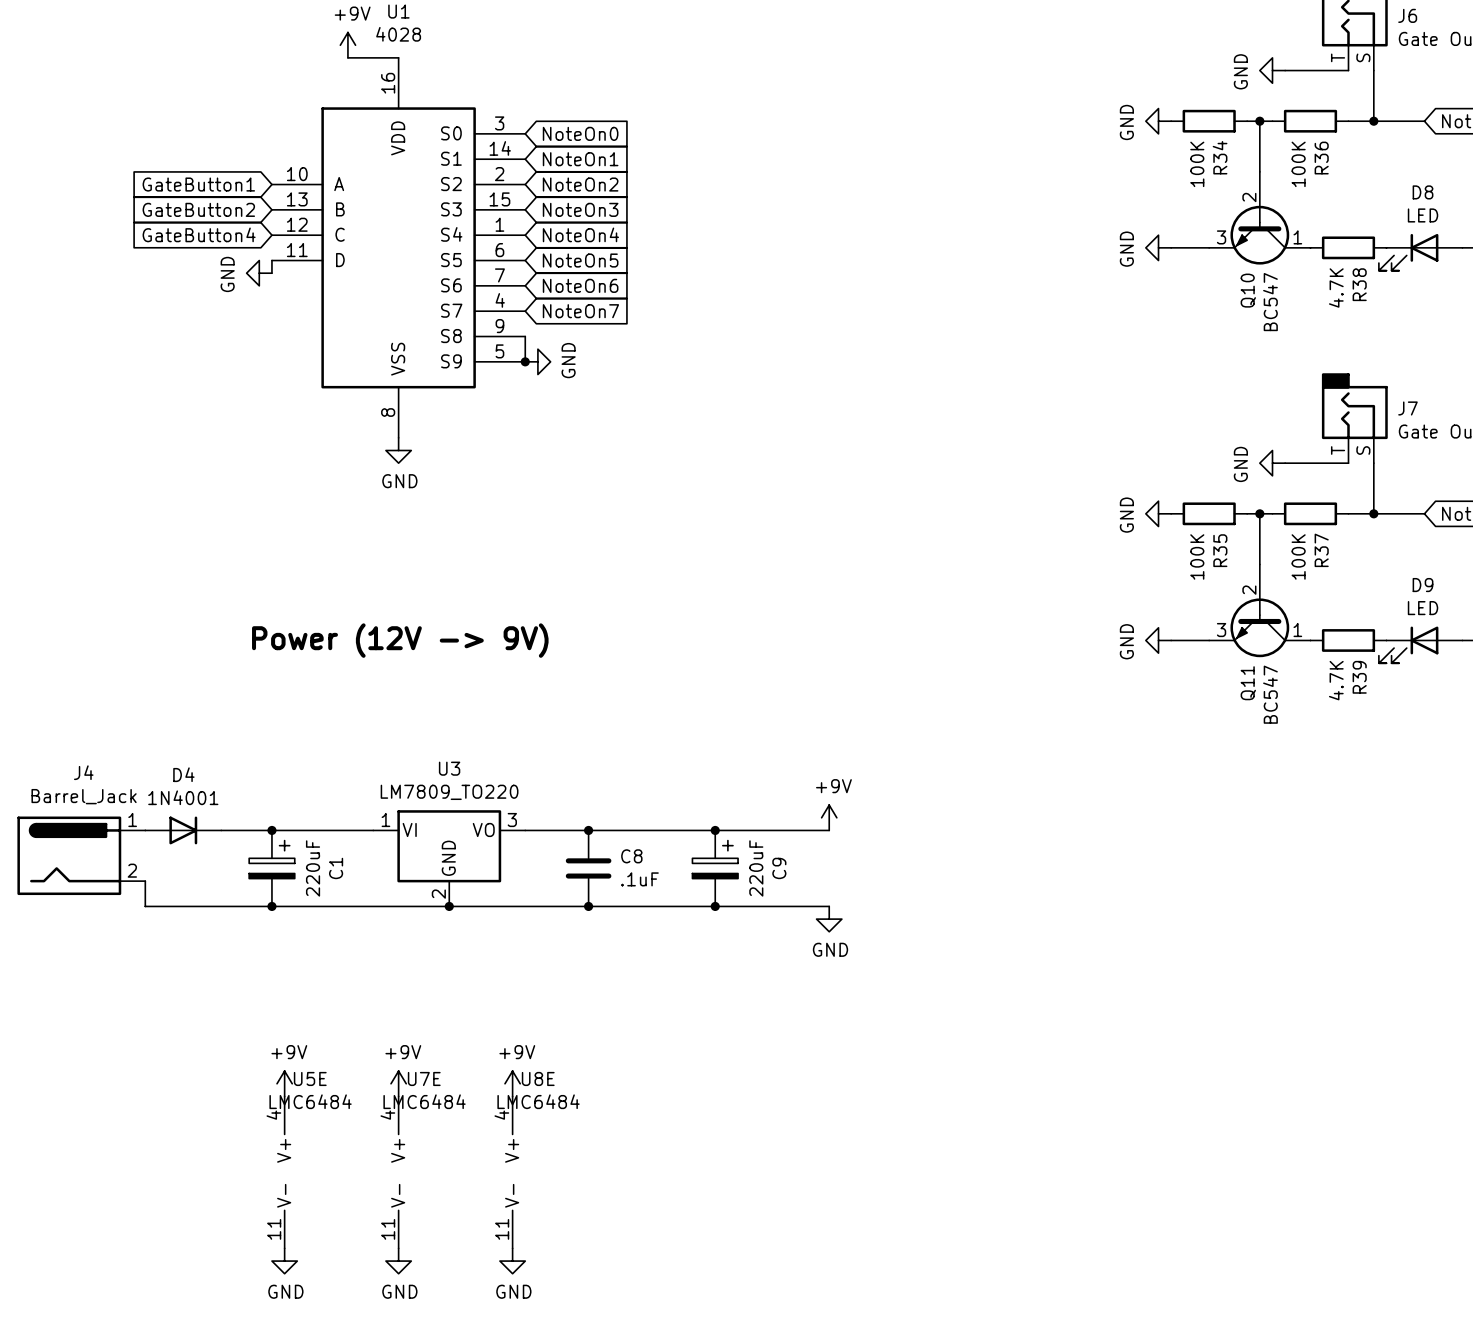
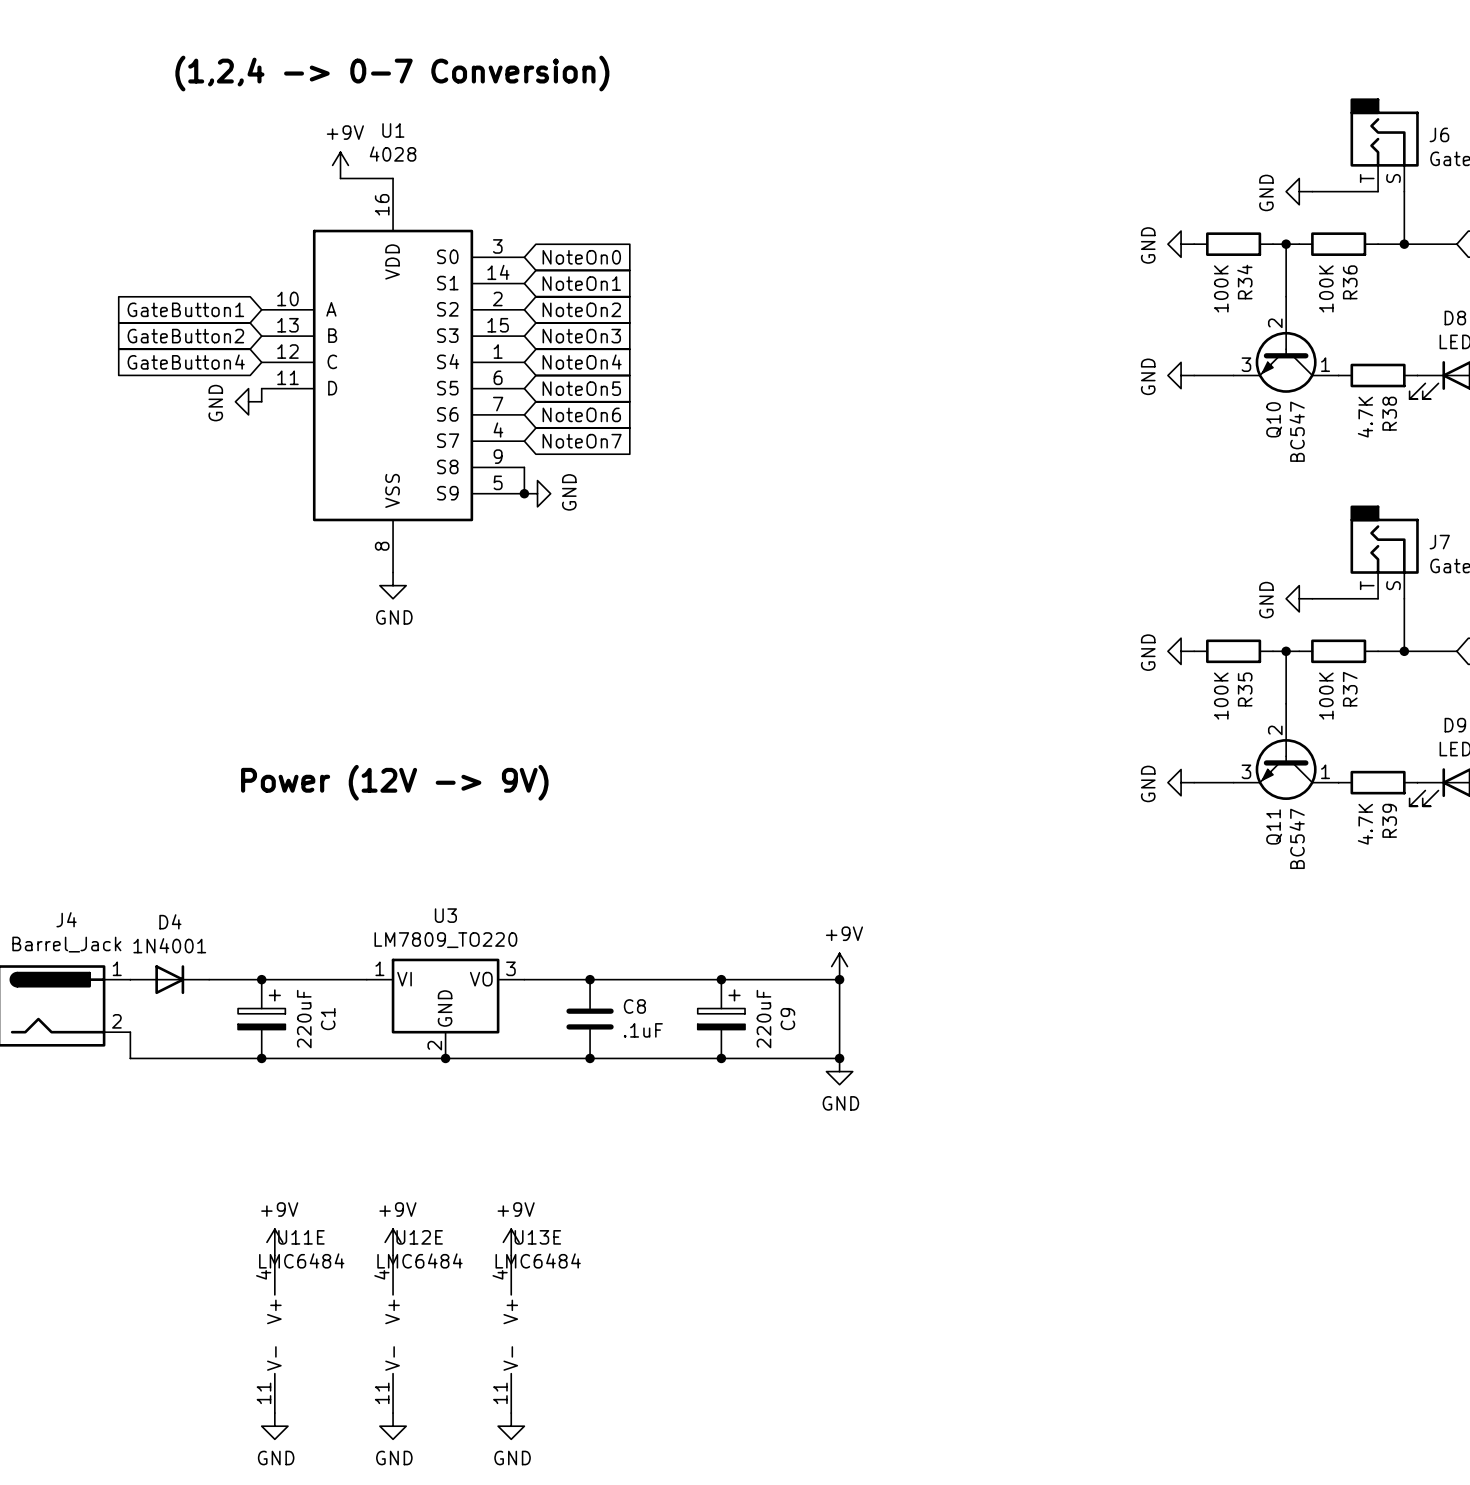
wire: none -> (839, 979) (839, 1058)
junction: none -> (839, 979)
junction: none -> (839, 1058)
U5E name: U5E (310, 1078) -> U11E (301, 1237)
U7E name: U7E (424, 1078) -> U12E (419, 1237)
U8E name: U8E (538, 1078) -> U13E (537, 1237)

